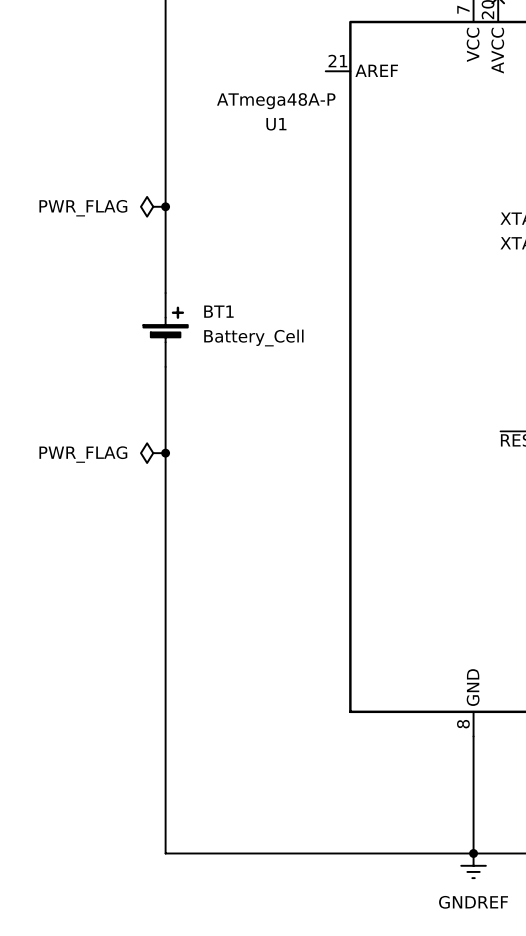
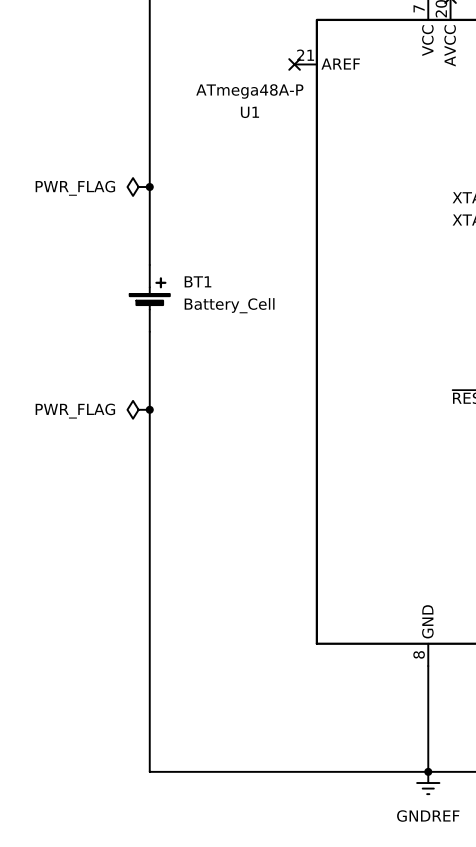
no-connect mark: none -> (294, 64)

